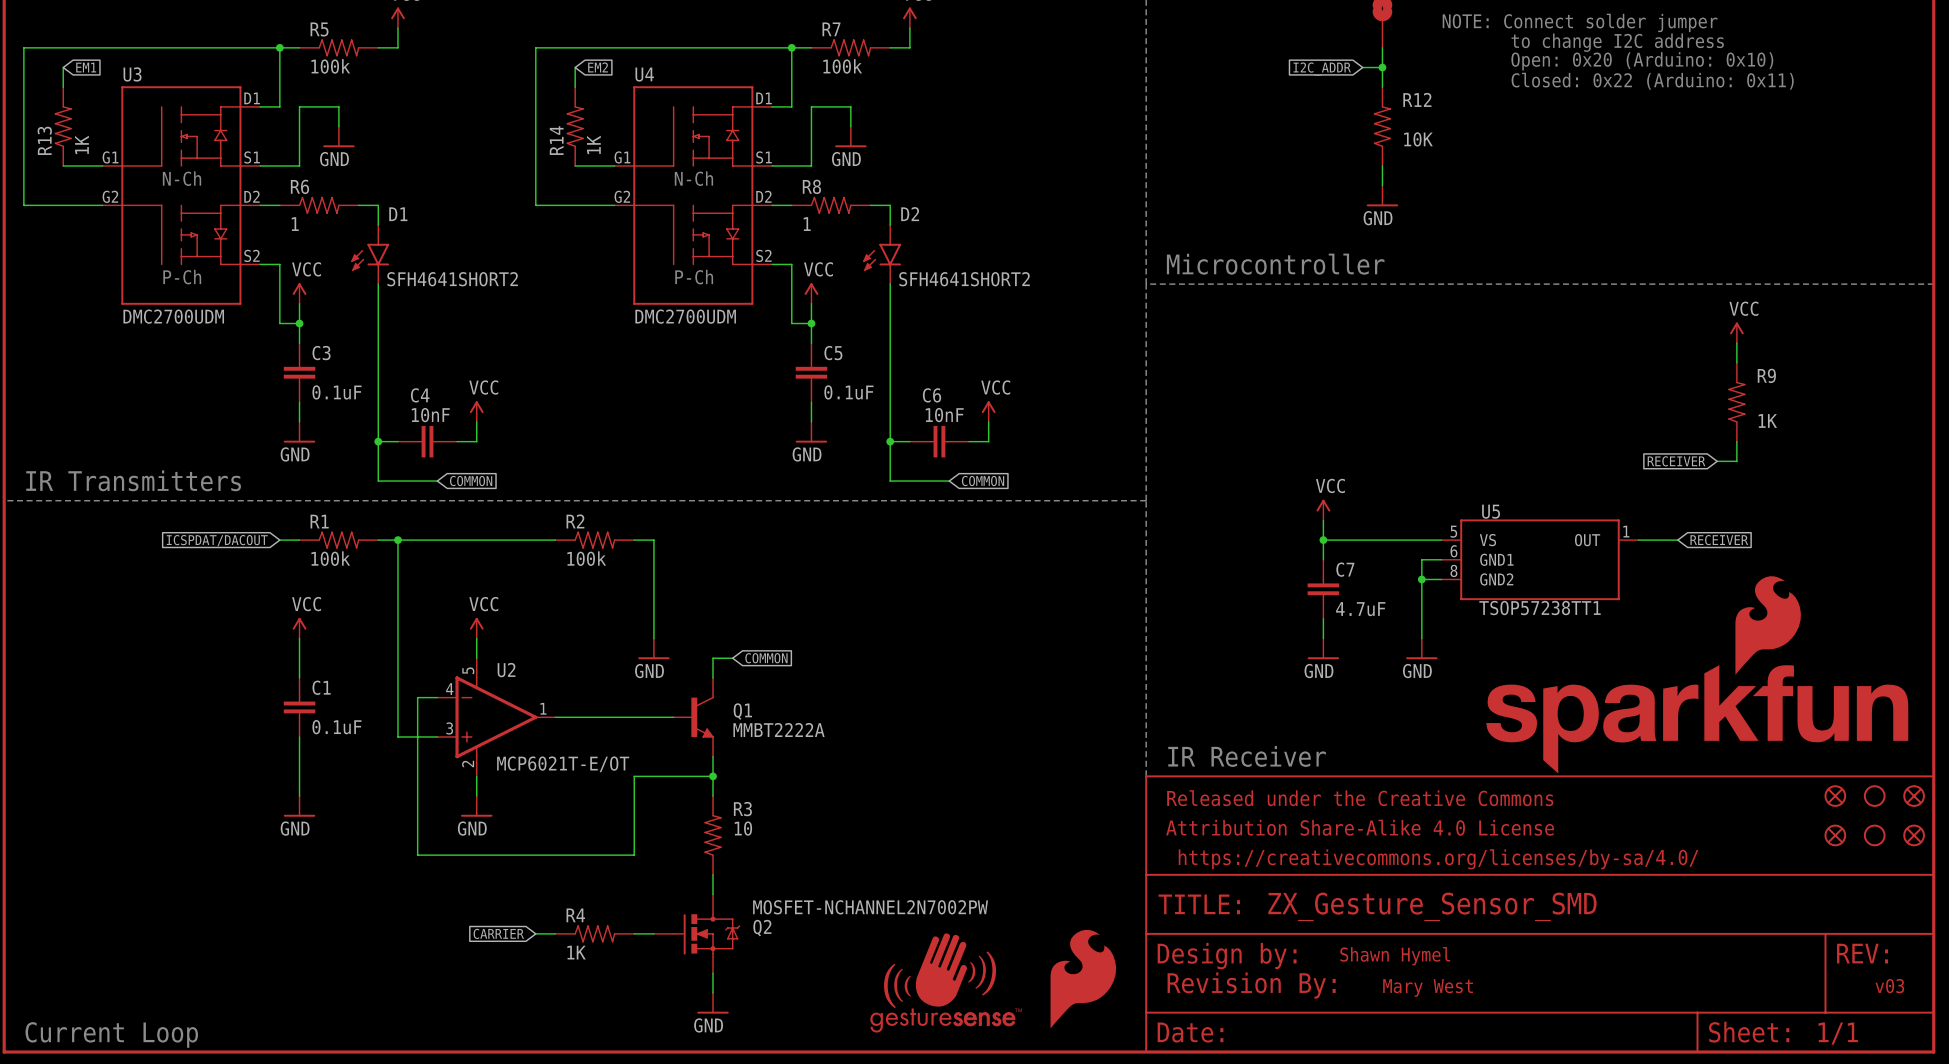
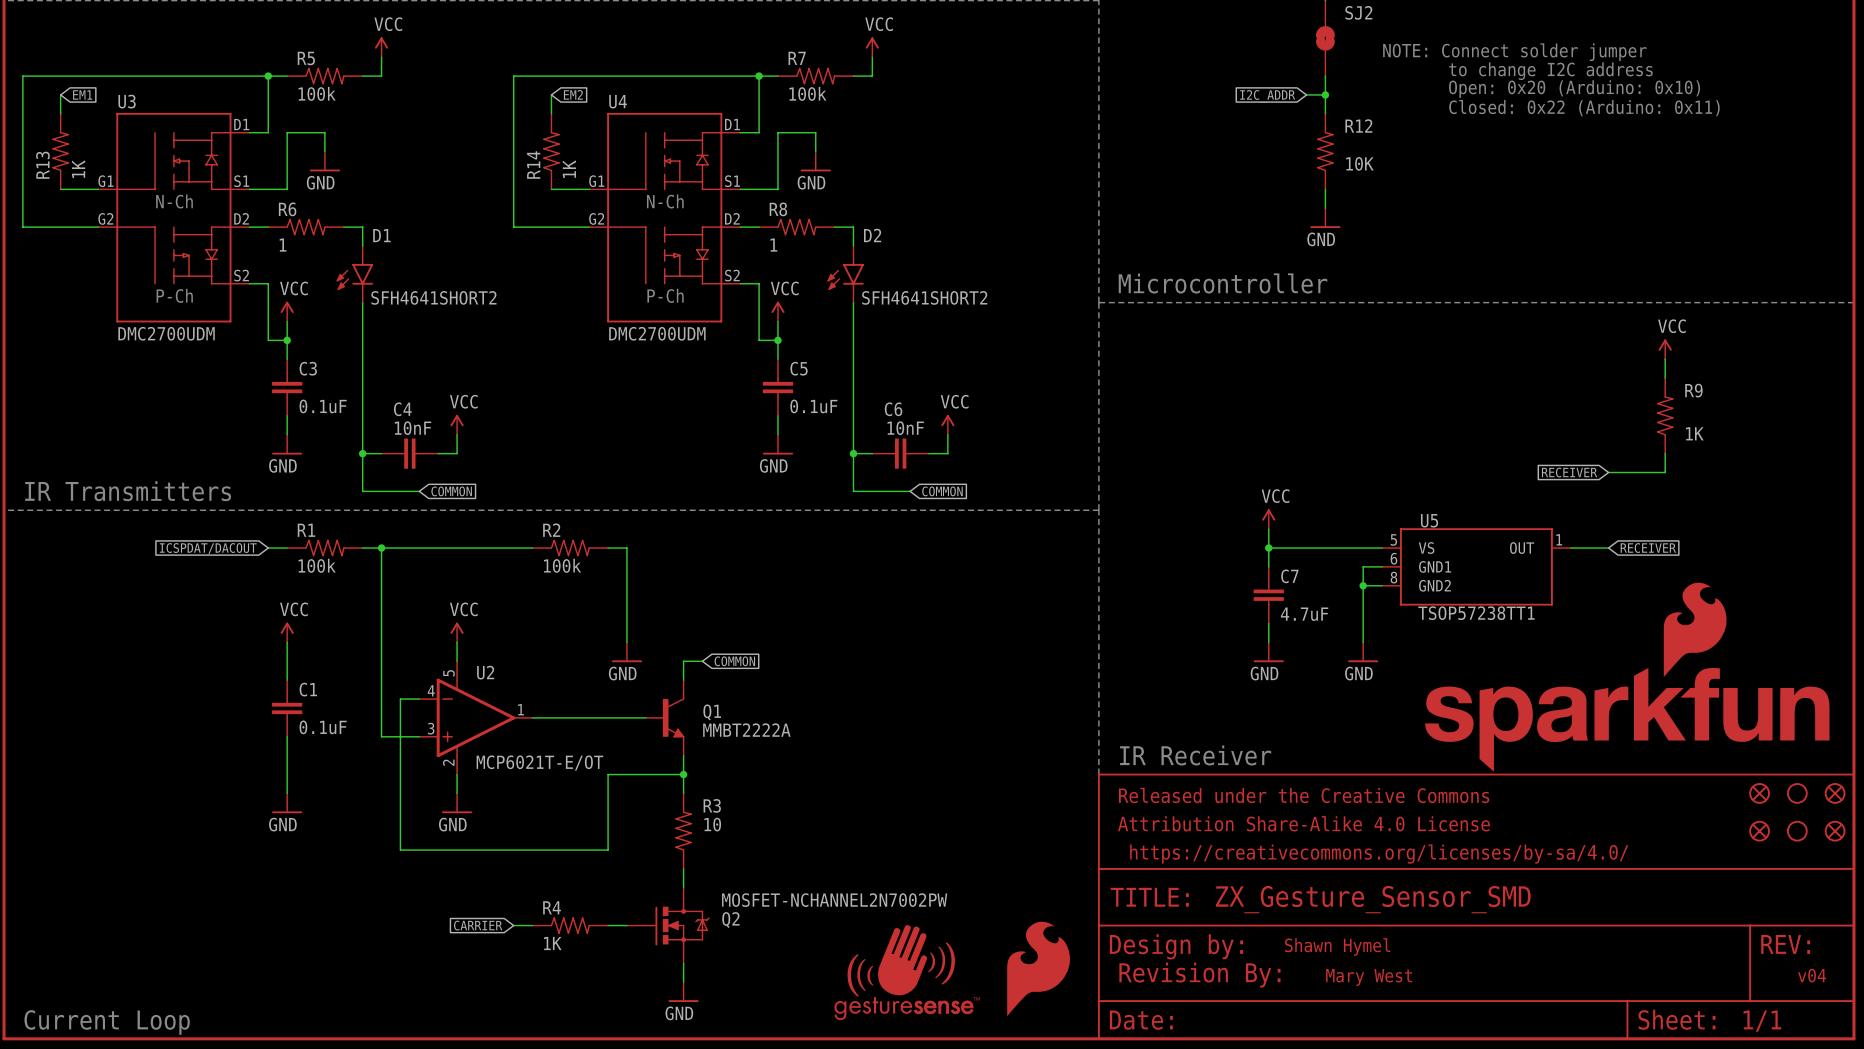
global label position: RECEIVER (1676, 461) -> RECEIVER (1569, 472)
wire: none -> (1608, 472) (1646, 472)
text: v03 (1889, 986) -> v04 (1812, 975)

